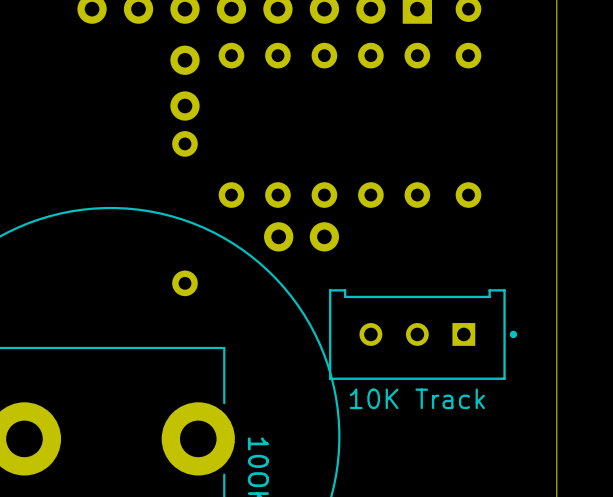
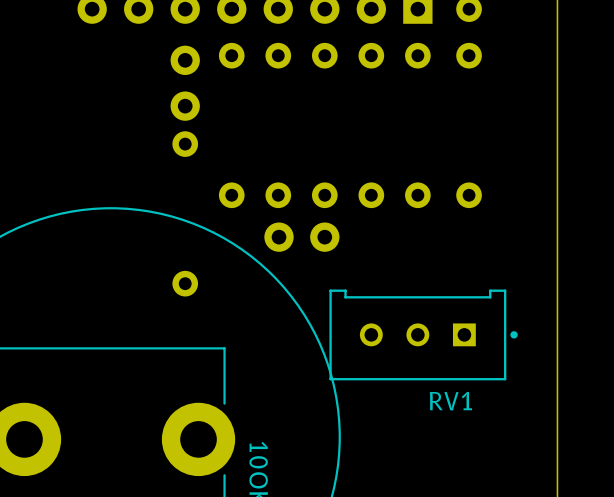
RV1 value: 10K Track (417, 398) -> none
RV1 name: none -> RV1 (450, 401)

